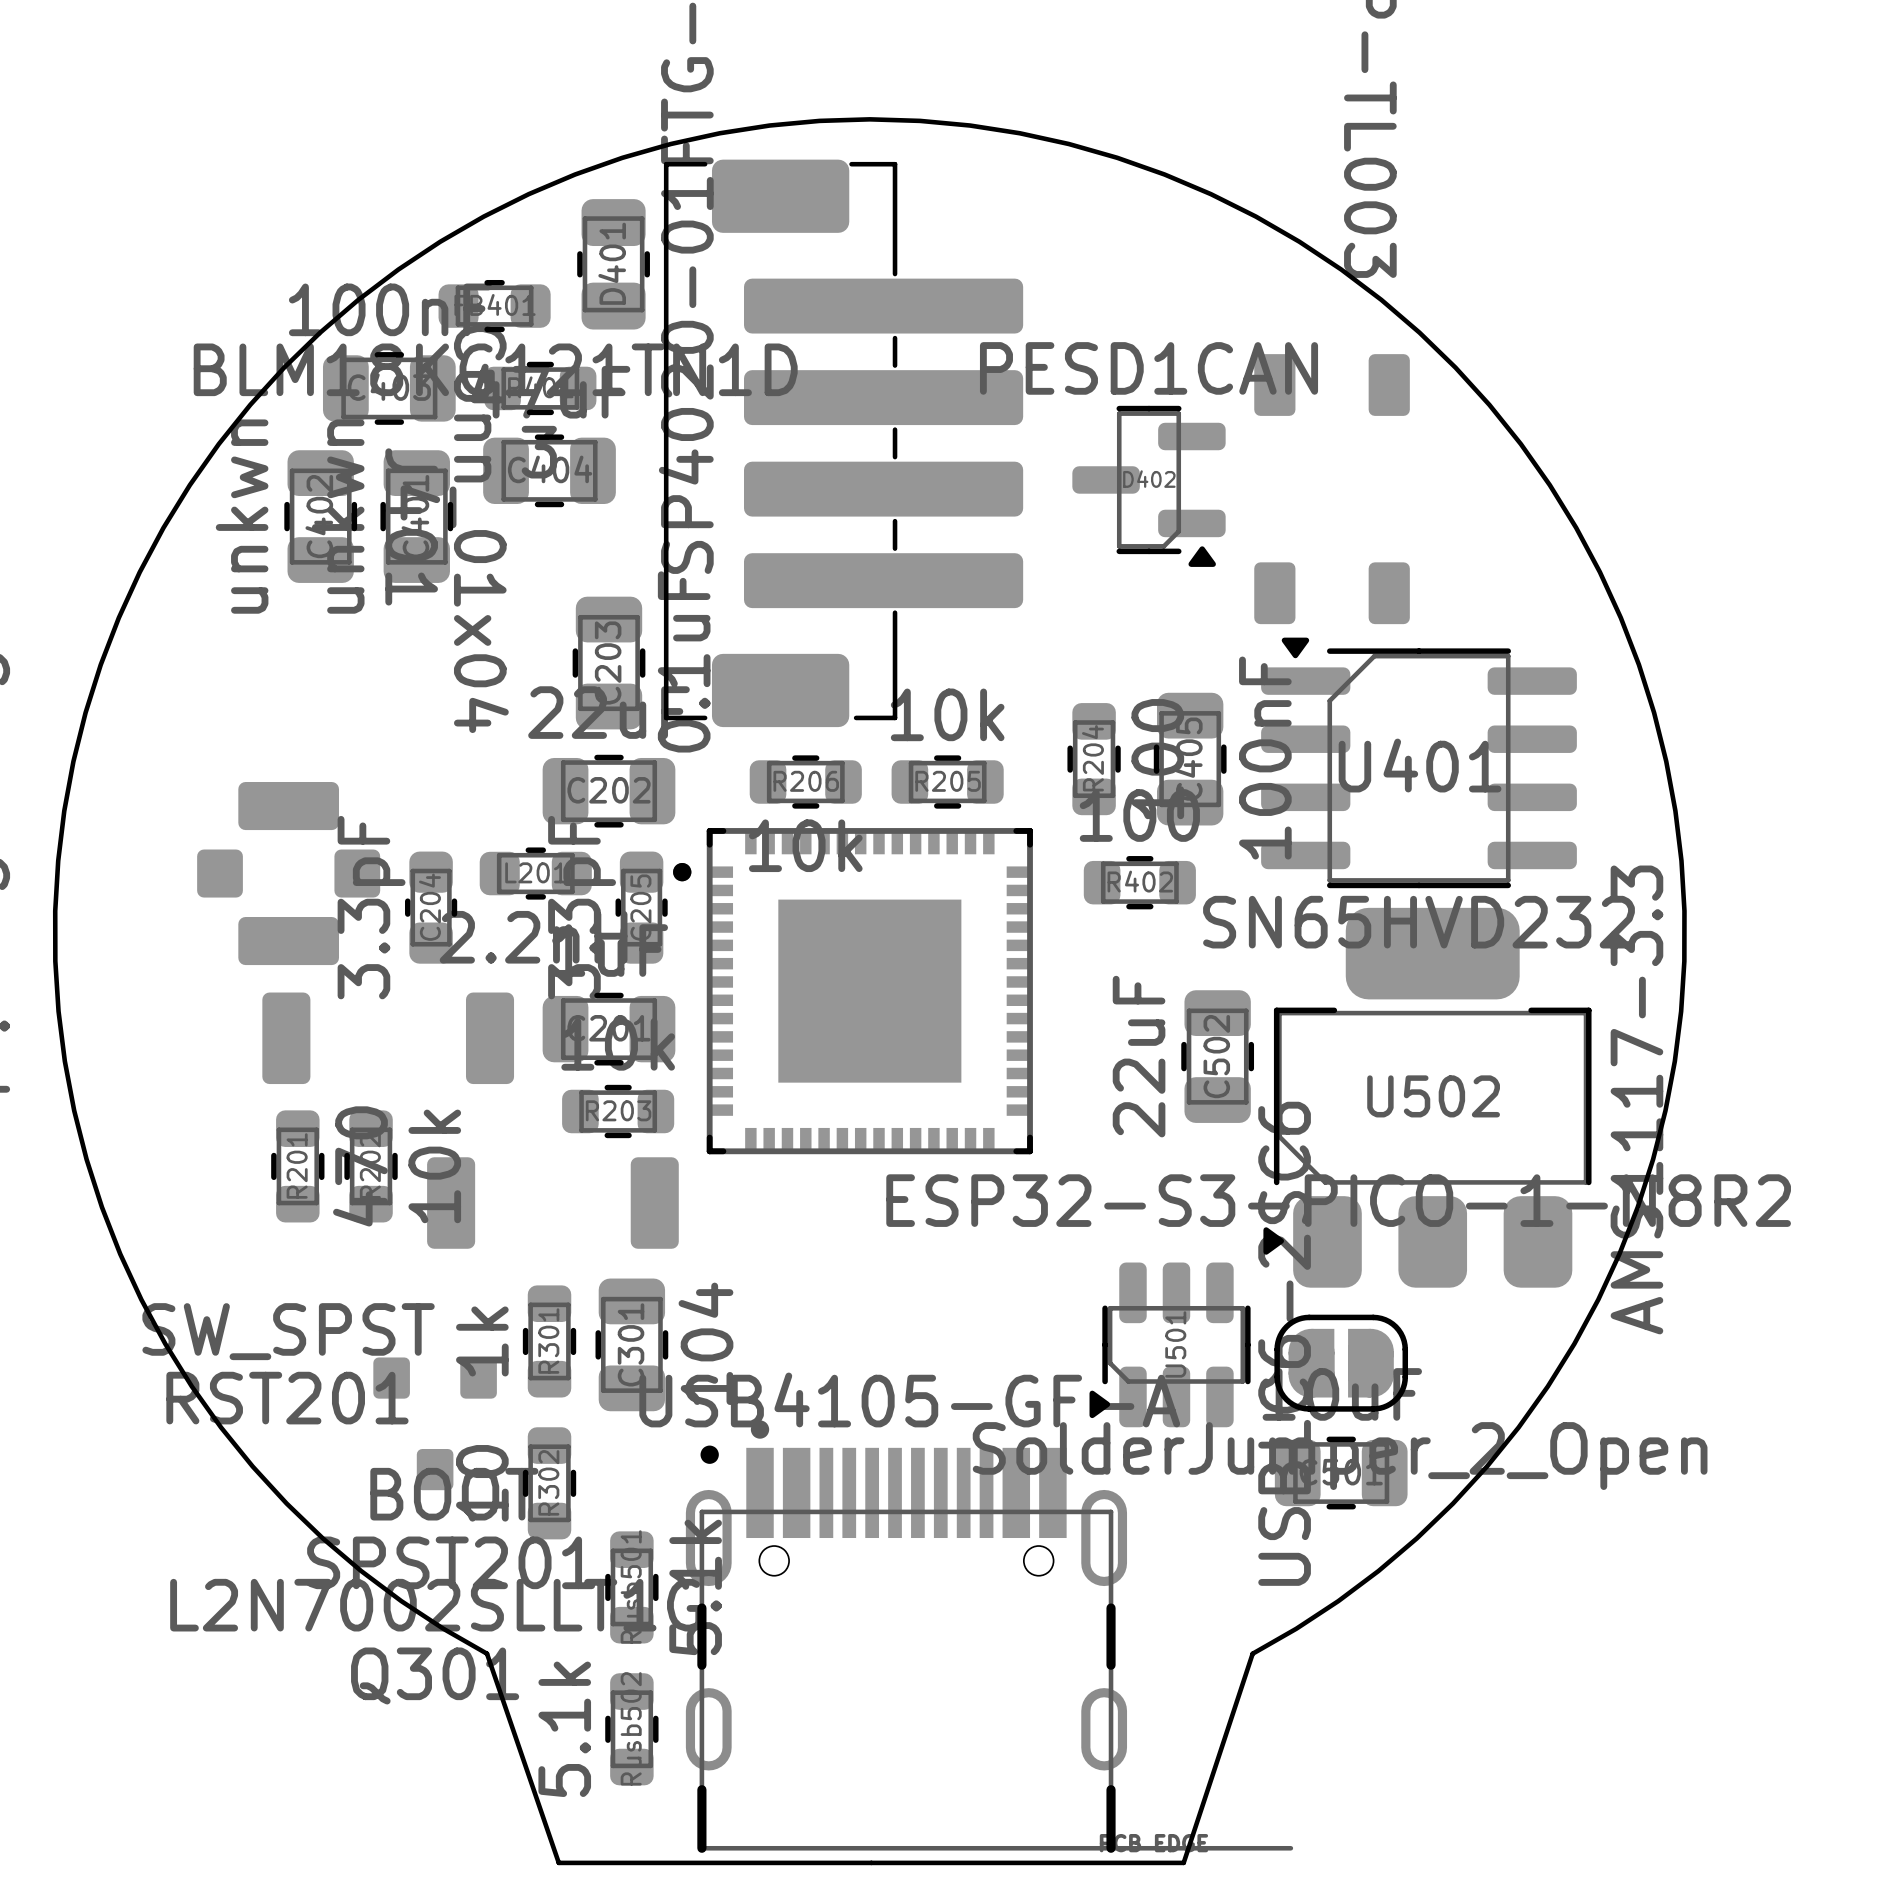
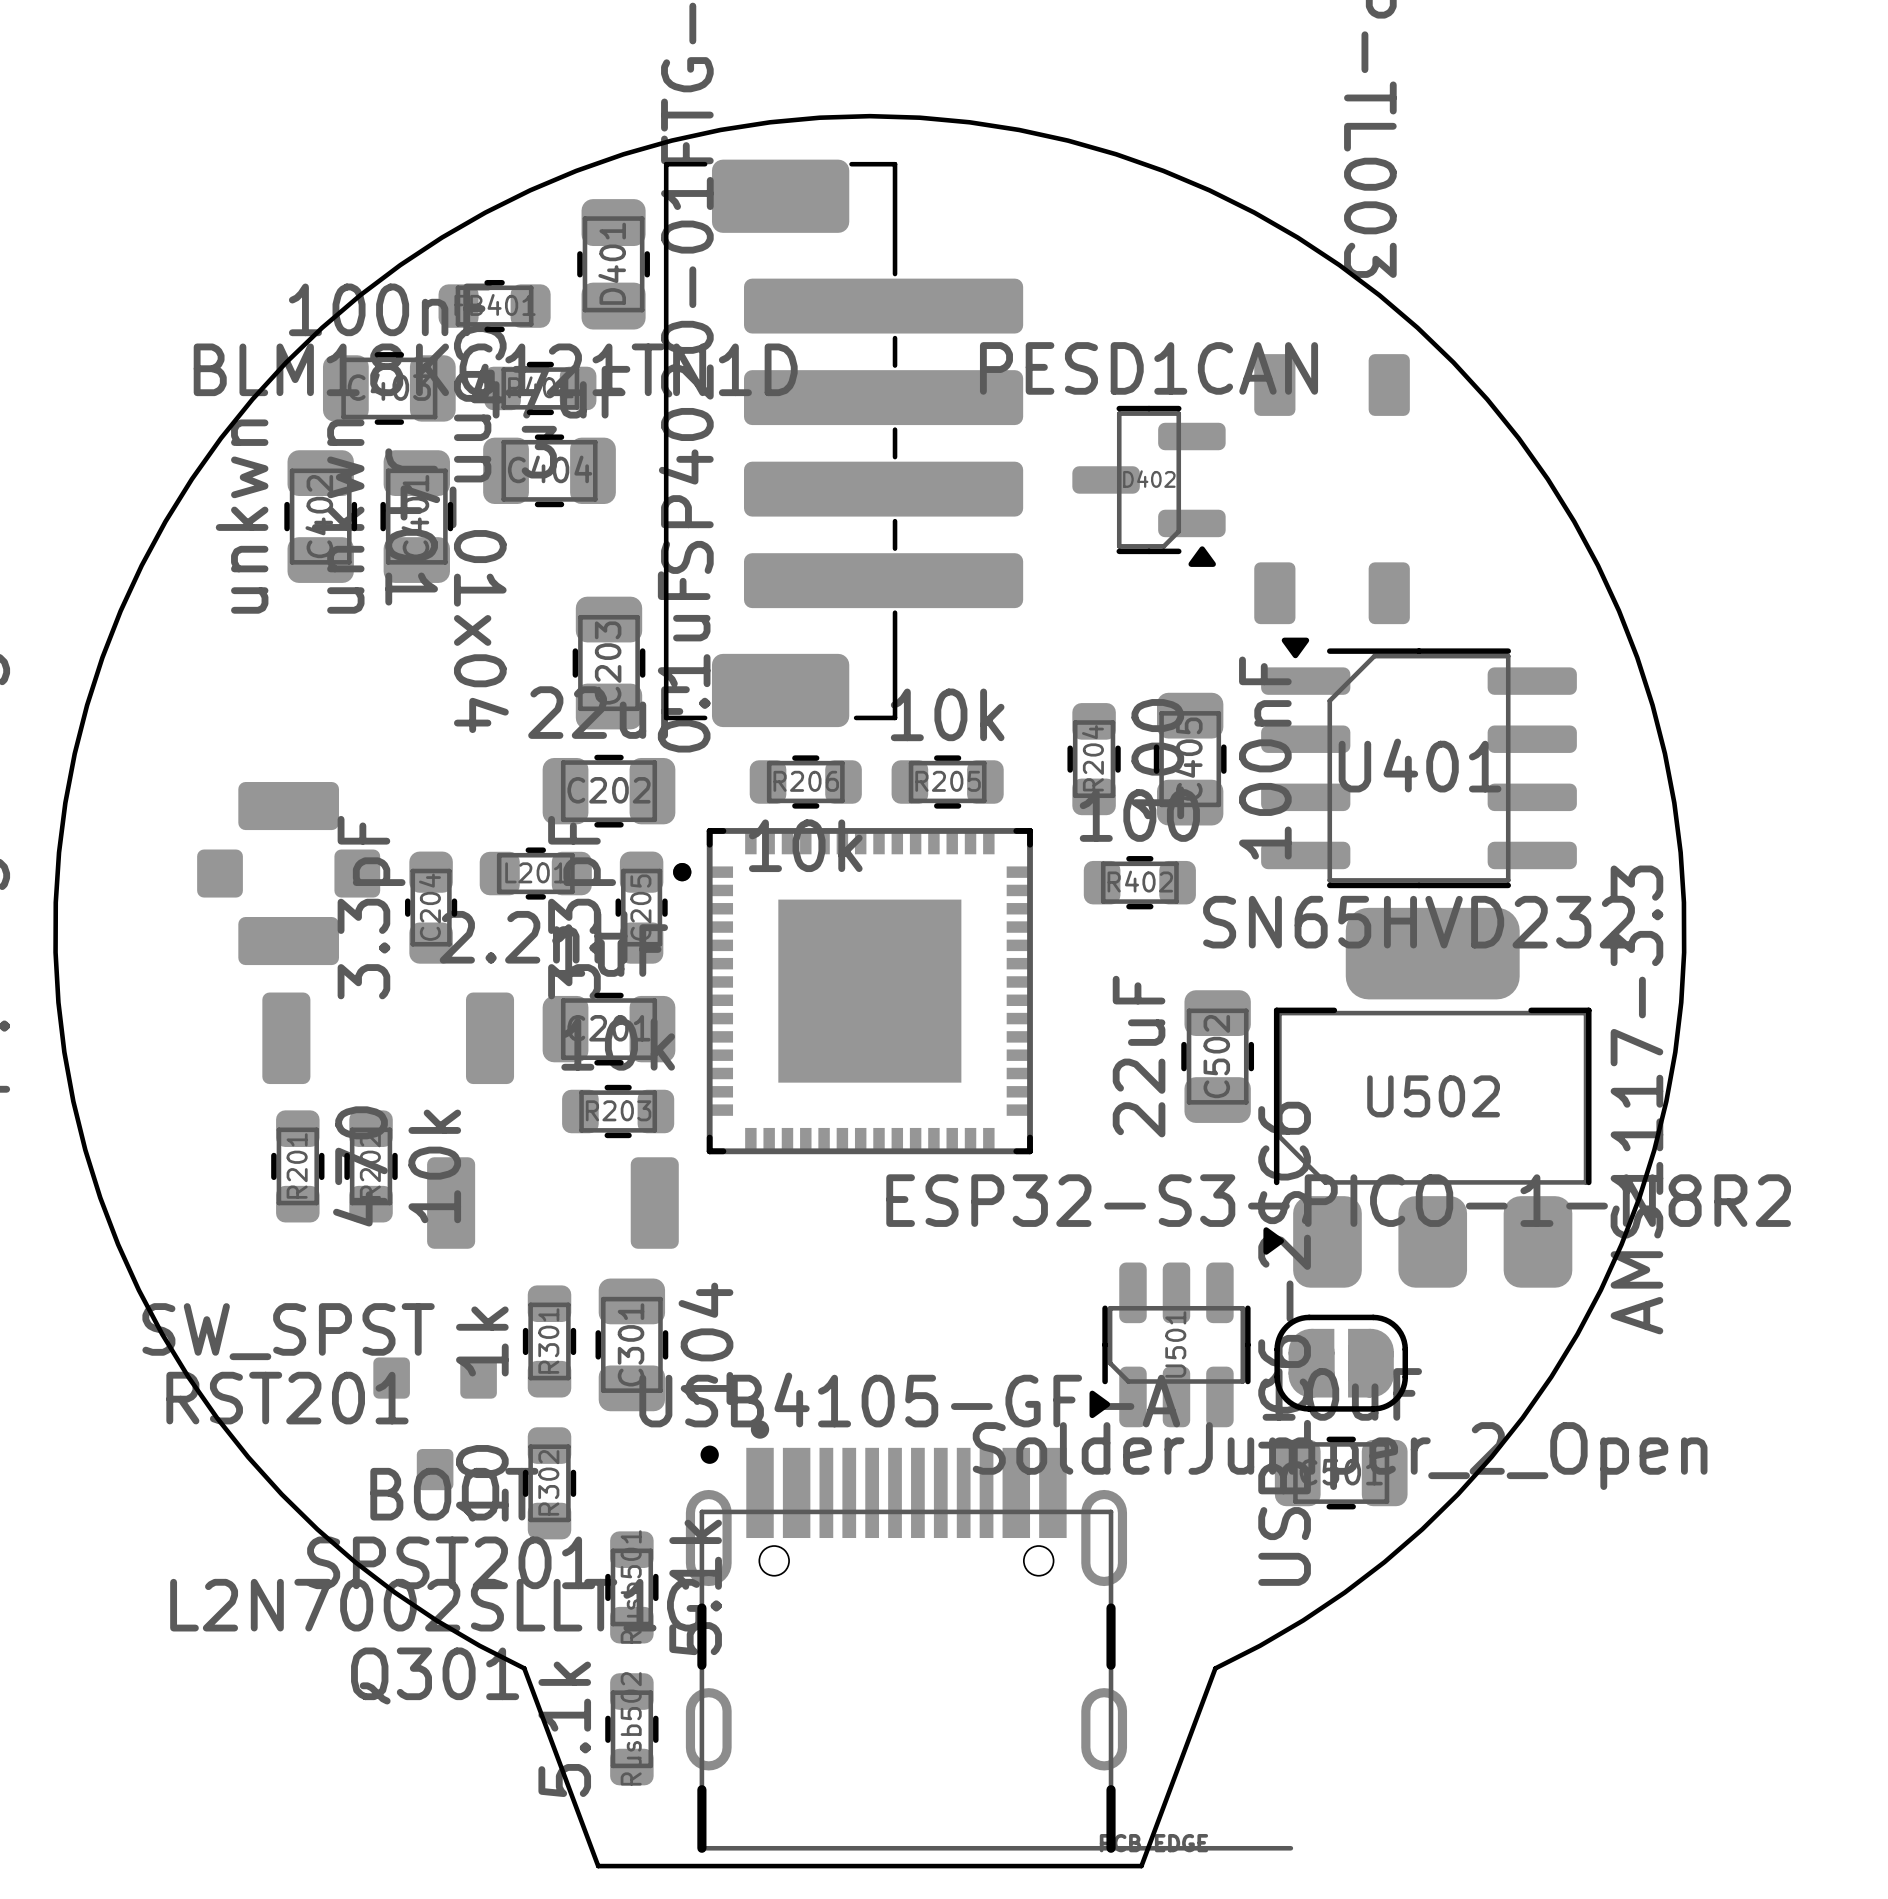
board edge: (487, 1653) (558, 1862) (1183, 1862) (1252, 1653) (1296, 1628) (1338, 1601) (1378, 1571) (1416, 1538) (1453, 1503) (1487, 1466) (1518, 1427) (1547, 1386) (1574, 1343) (1598, 1299) (1619, 1254) (1637, 1207) (1653, 1159) (1665, 1110) (1674, 1061) (1681, 1011) (1684, 961) (1684, 910) (1681, 860) (1675, 810) (1666, 761) (1654, 712) (1638, 664) (1620, 617) (1599, 572) (1576, 527) (1549, 485) (1520, 444) (1489, 404) (1455, 367) (1419, 332) (1381, 299) (1341, 269) (1299, 241) (1255, 216) (1210, 194) (1164, 174) (1117, 157) (1068, 144) (1019, 133) (970, 125) (920, 120) (869, 119) (819, 120) (769, 125) (719, 133) (670, 144) (622, 157) (575, 174) (528, 194) (483, 216) (440, 241) (398, 269) (358, 299) (320, 332) (284, 367) (250, 404) (218, 444) (189, 485) (163, 527) (139, 572) (118, 617) (100, 664) (85, 712) (73, 761) (64, 810) (58, 860) (55, 910) (55, 961) (58, 1011) (64, 1061) (74, 1110) (86, 1159) (101, 1207) (120, 1254) (141, 1299) (165, 1343) (191, 1386) (221, 1427) (252, 1466) (286, 1503) (322, 1538) (361, 1571) (401, 1601) (443, 1628) (487, 1653) -> (524, 1668) (479, 1645) (436, 1620) (394, 1592) (355, 1562) (317, 1529) (281, 1494) (248, 1457) (217, 1417) (188, 1376) (162, 1334) (138, 1290) (118, 1244) (100, 1197) (85, 1149) (73, 1101) (64, 1052) (58, 1002) (55, 952) (55, 902) (59, 852) (65, 802) (74, 753) (87, 705) (102, 657) (120, 611) (141, 565) (165, 521) (191, 479) (220, 438) (252, 399) (286, 362) (322, 327) (360, 295) (400, 265) (442, 237) (485, 212) (530, 190) (576, 170) (623, 154) (671, 140) (720, 129) (770, 122) (819, 117) (869, 116) (919, 117) (969, 122) (1019, 129) (1068, 140) (1116, 154) (1163, 170) (1209, 190) (1254, 212) (1297, 237) (1339, 265) (1379, 295) (1417, 327) (1453, 362) (1487, 399) (1518, 438) (1547, 479) (1574, 521) (1598, 565) (1619, 611) (1637, 657) (1652, 705) (1664, 753) (1674, 802) (1680, 852) (1683, 902) (1684, 952) (1681, 1002) (1675, 1052) (1666, 1101) (1654, 1149) (1639, 1197) (1621, 1244) (1600, 1290) (1577, 1334) (1551, 1376) (1522, 1417) (1491, 1457) (1458, 1494) (1422, 1529) (1384, 1562) (1344, 1592) (1303, 1620) (1260, 1645) (1215, 1668) (1141, 1866) (598, 1866) (524, 1668)

